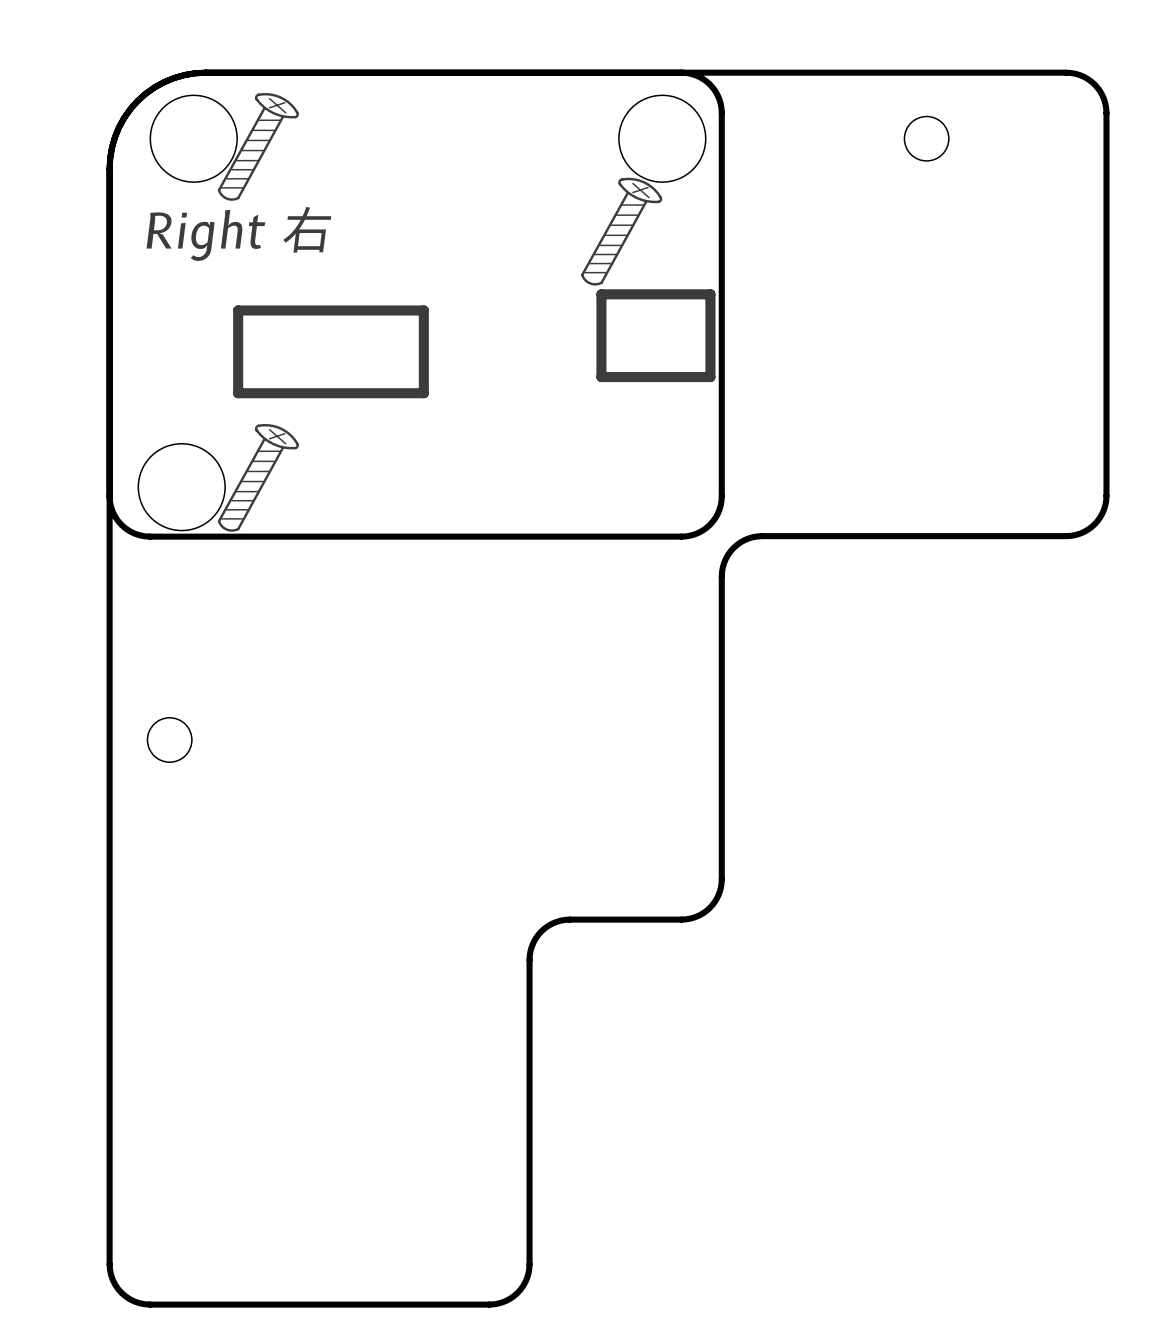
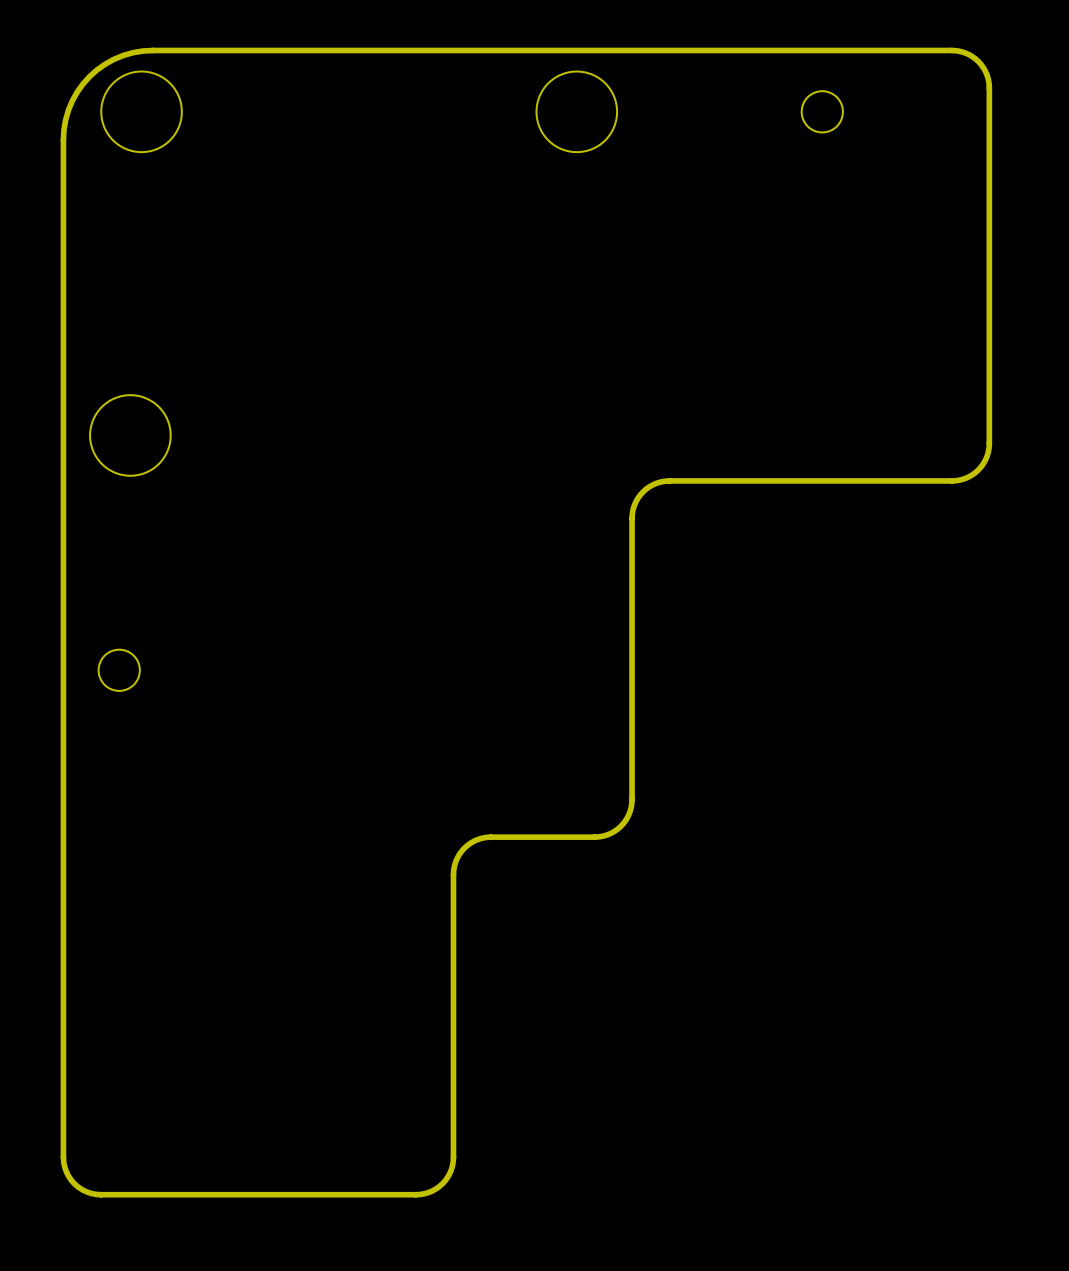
drawing: [106, 69, 725, 540] -> none
text: Right 右 (238, 233) -> none
line: (710, 294) (601, 294) (601, 377) (710, 377) (710, 294) -> none
line: (423, 310) (238, 310) (238, 393) (423, 393) (423, 310) -> none

